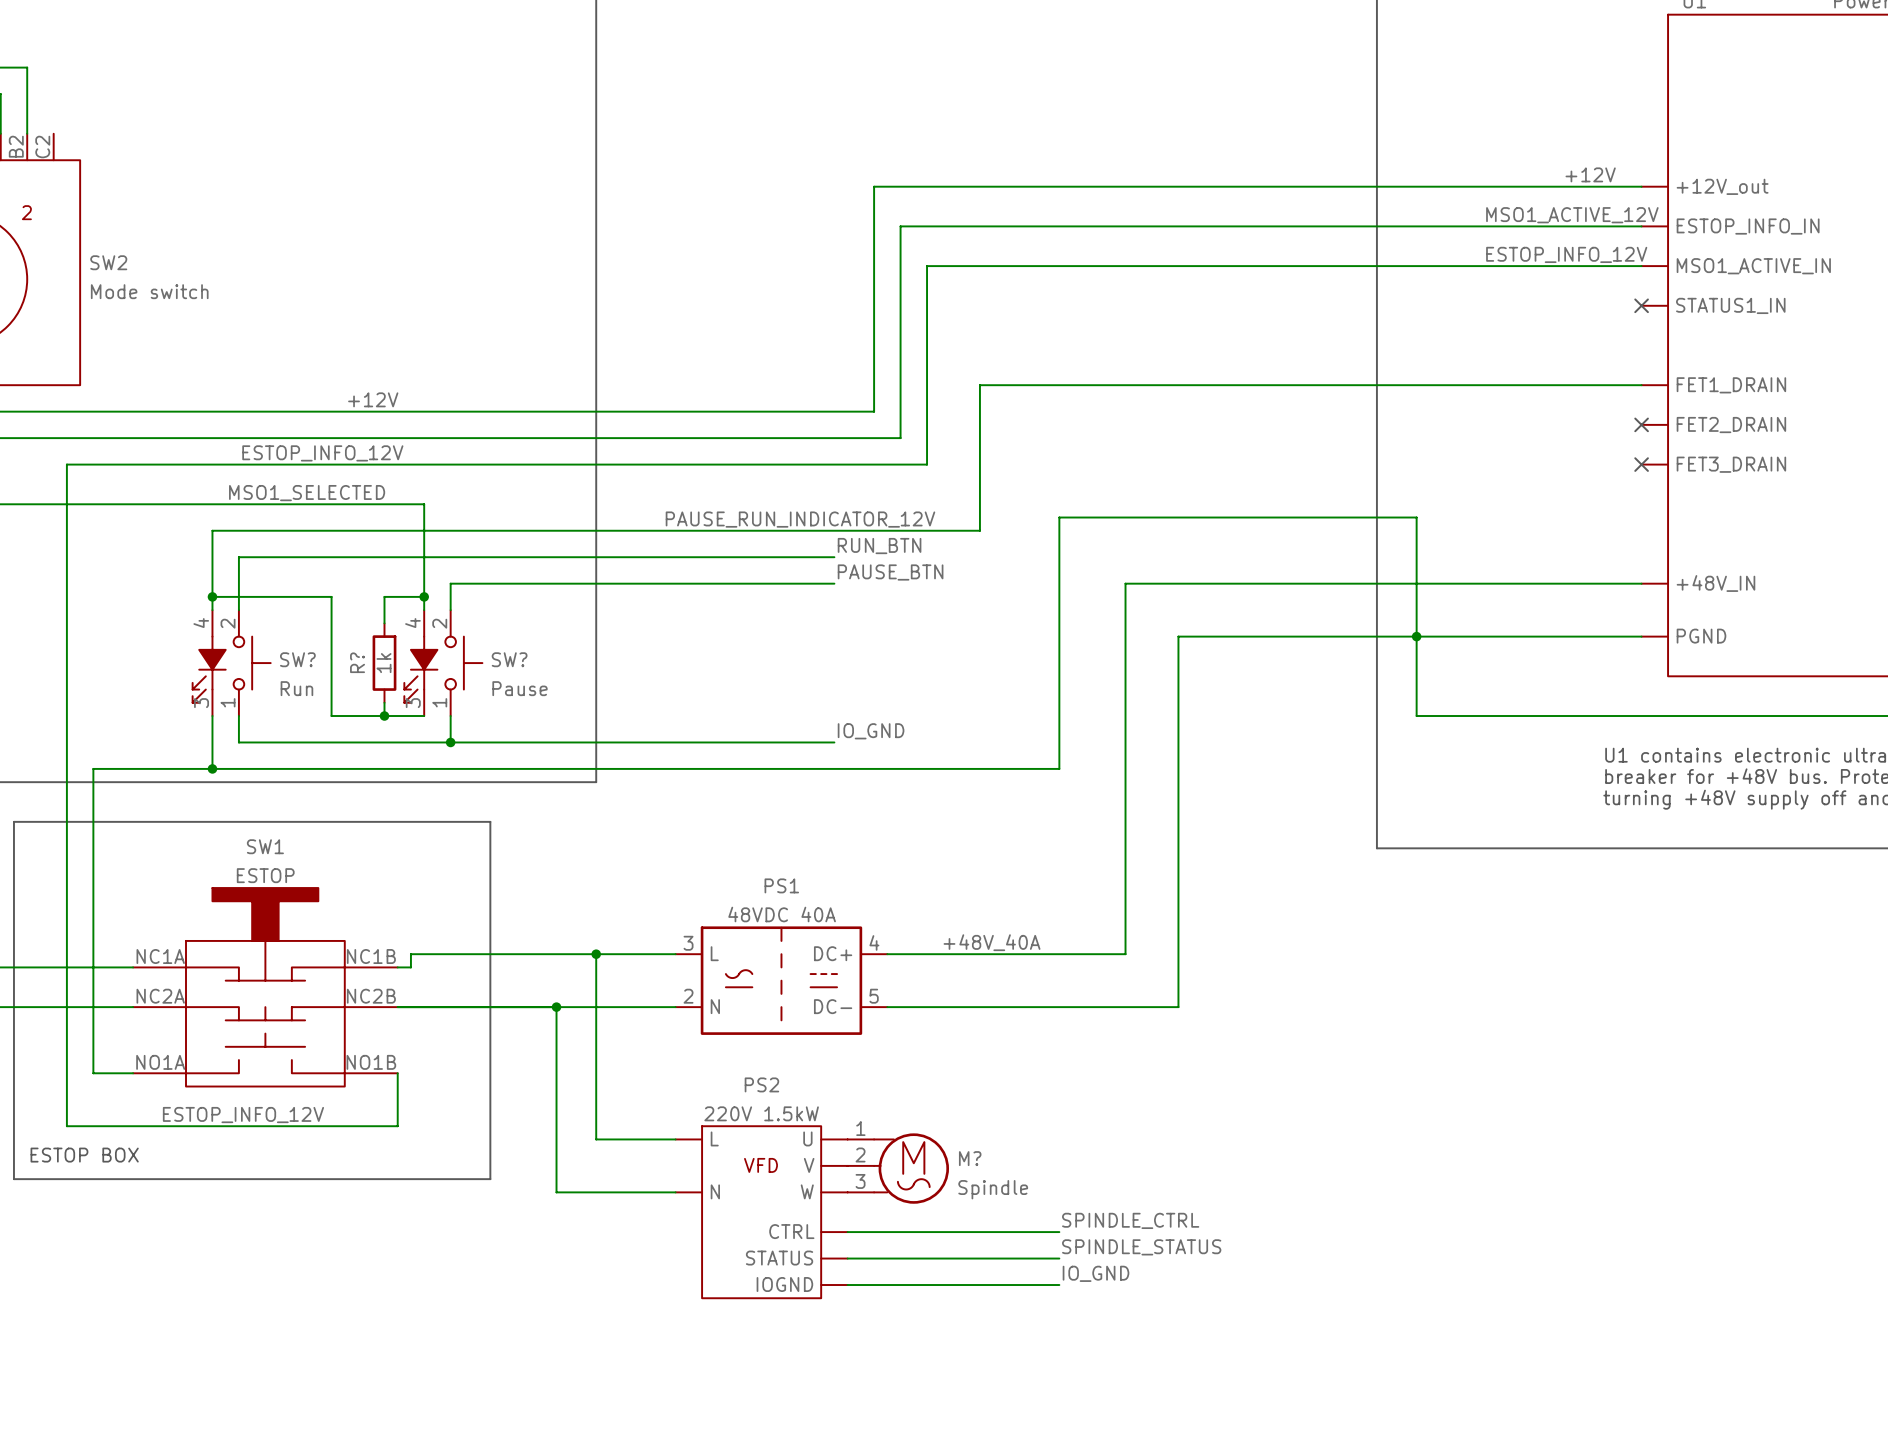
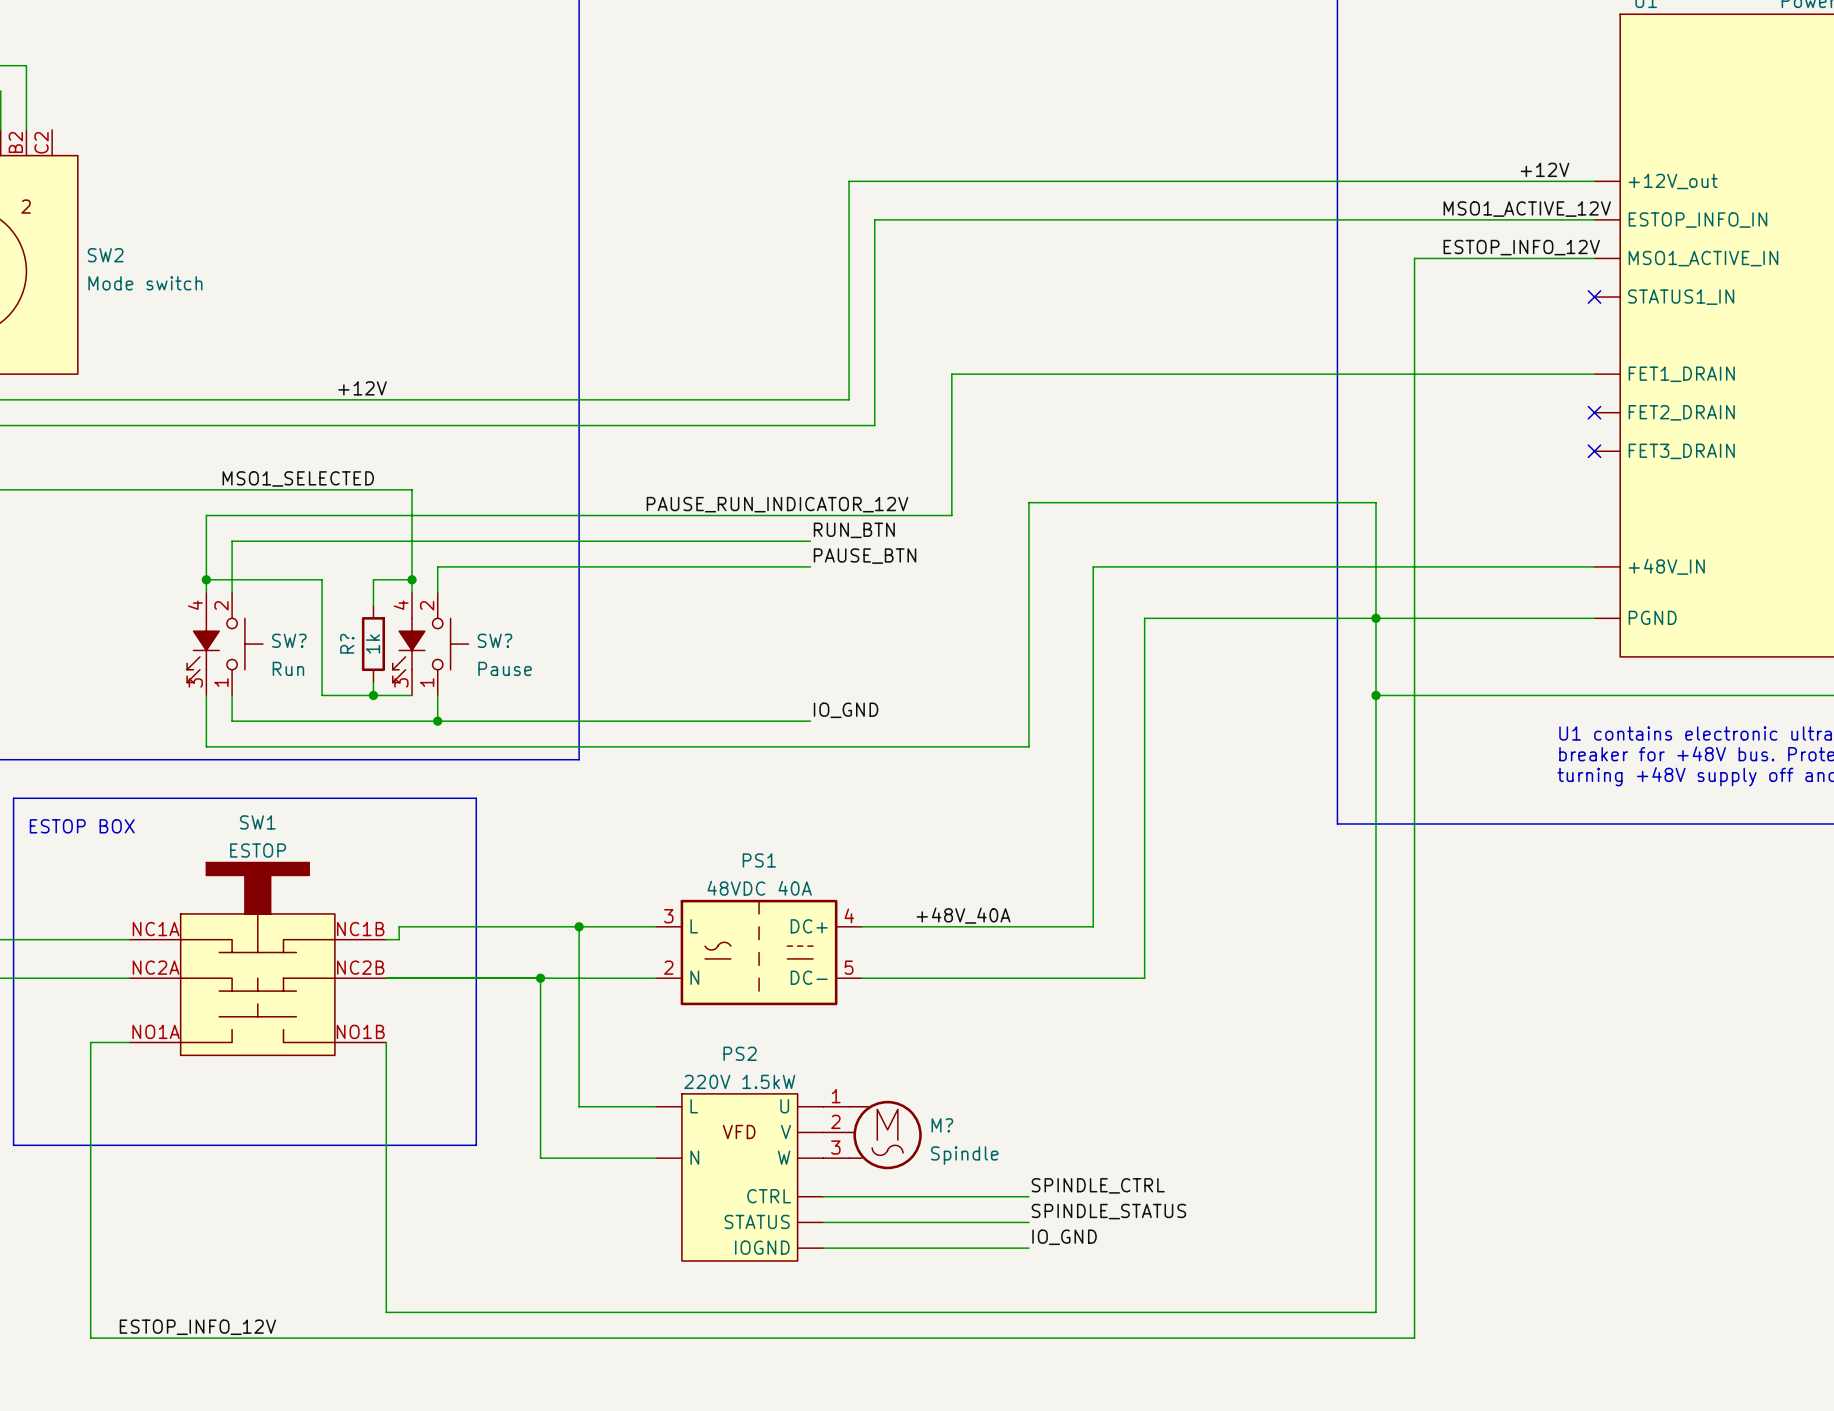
wire: (1456, 266) (927, 266) (927, 464) (66, 464) (66, 1126) (397, 1126) -> (1414, 258) (1414, 1338) (90, 1338) (90, 1042)
label: ESTOP_INFO_12V (322, 453) -> none
wire: none -> (1375, 695) (1375, 1312) (386, 1312) (386, 1093)
junction: none -> (1375, 695)
wire: (212, 768) (93, 768) (93, 1073) -> none
junction: (212, 768) -> none
text: none -> ESTOP BOX (82, 826)
label position: ESTOP_INFO_12V (243, 1115) -> ESTOP_INFO_12V (197, 1327)
text: ESTOP BOX (84, 1155) -> none

